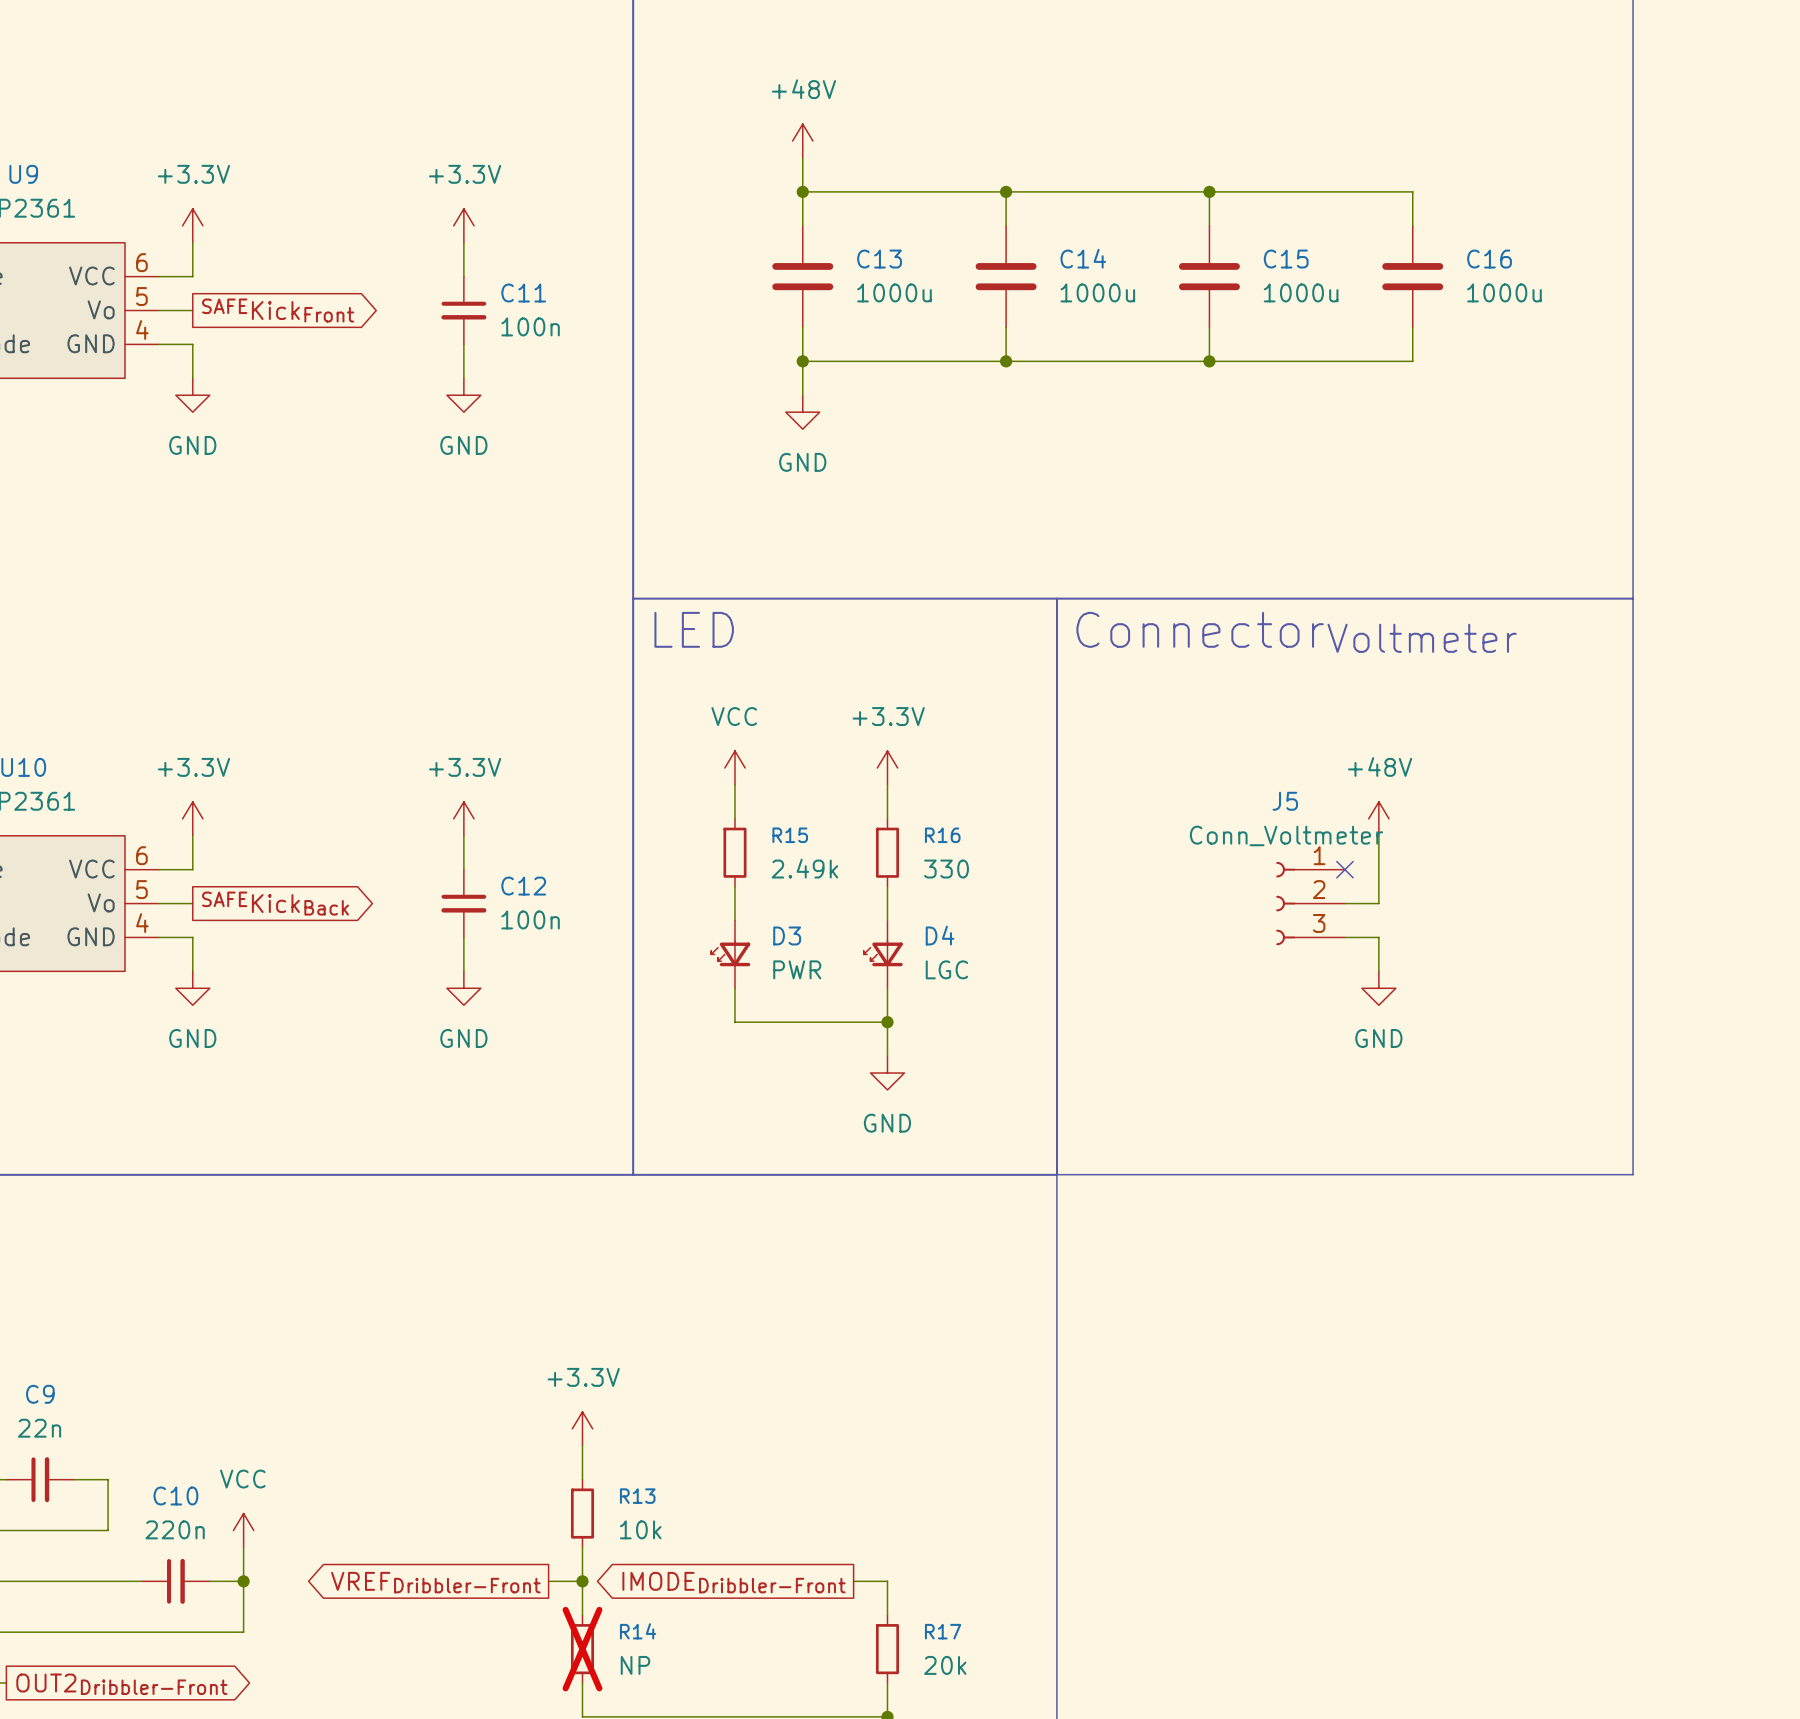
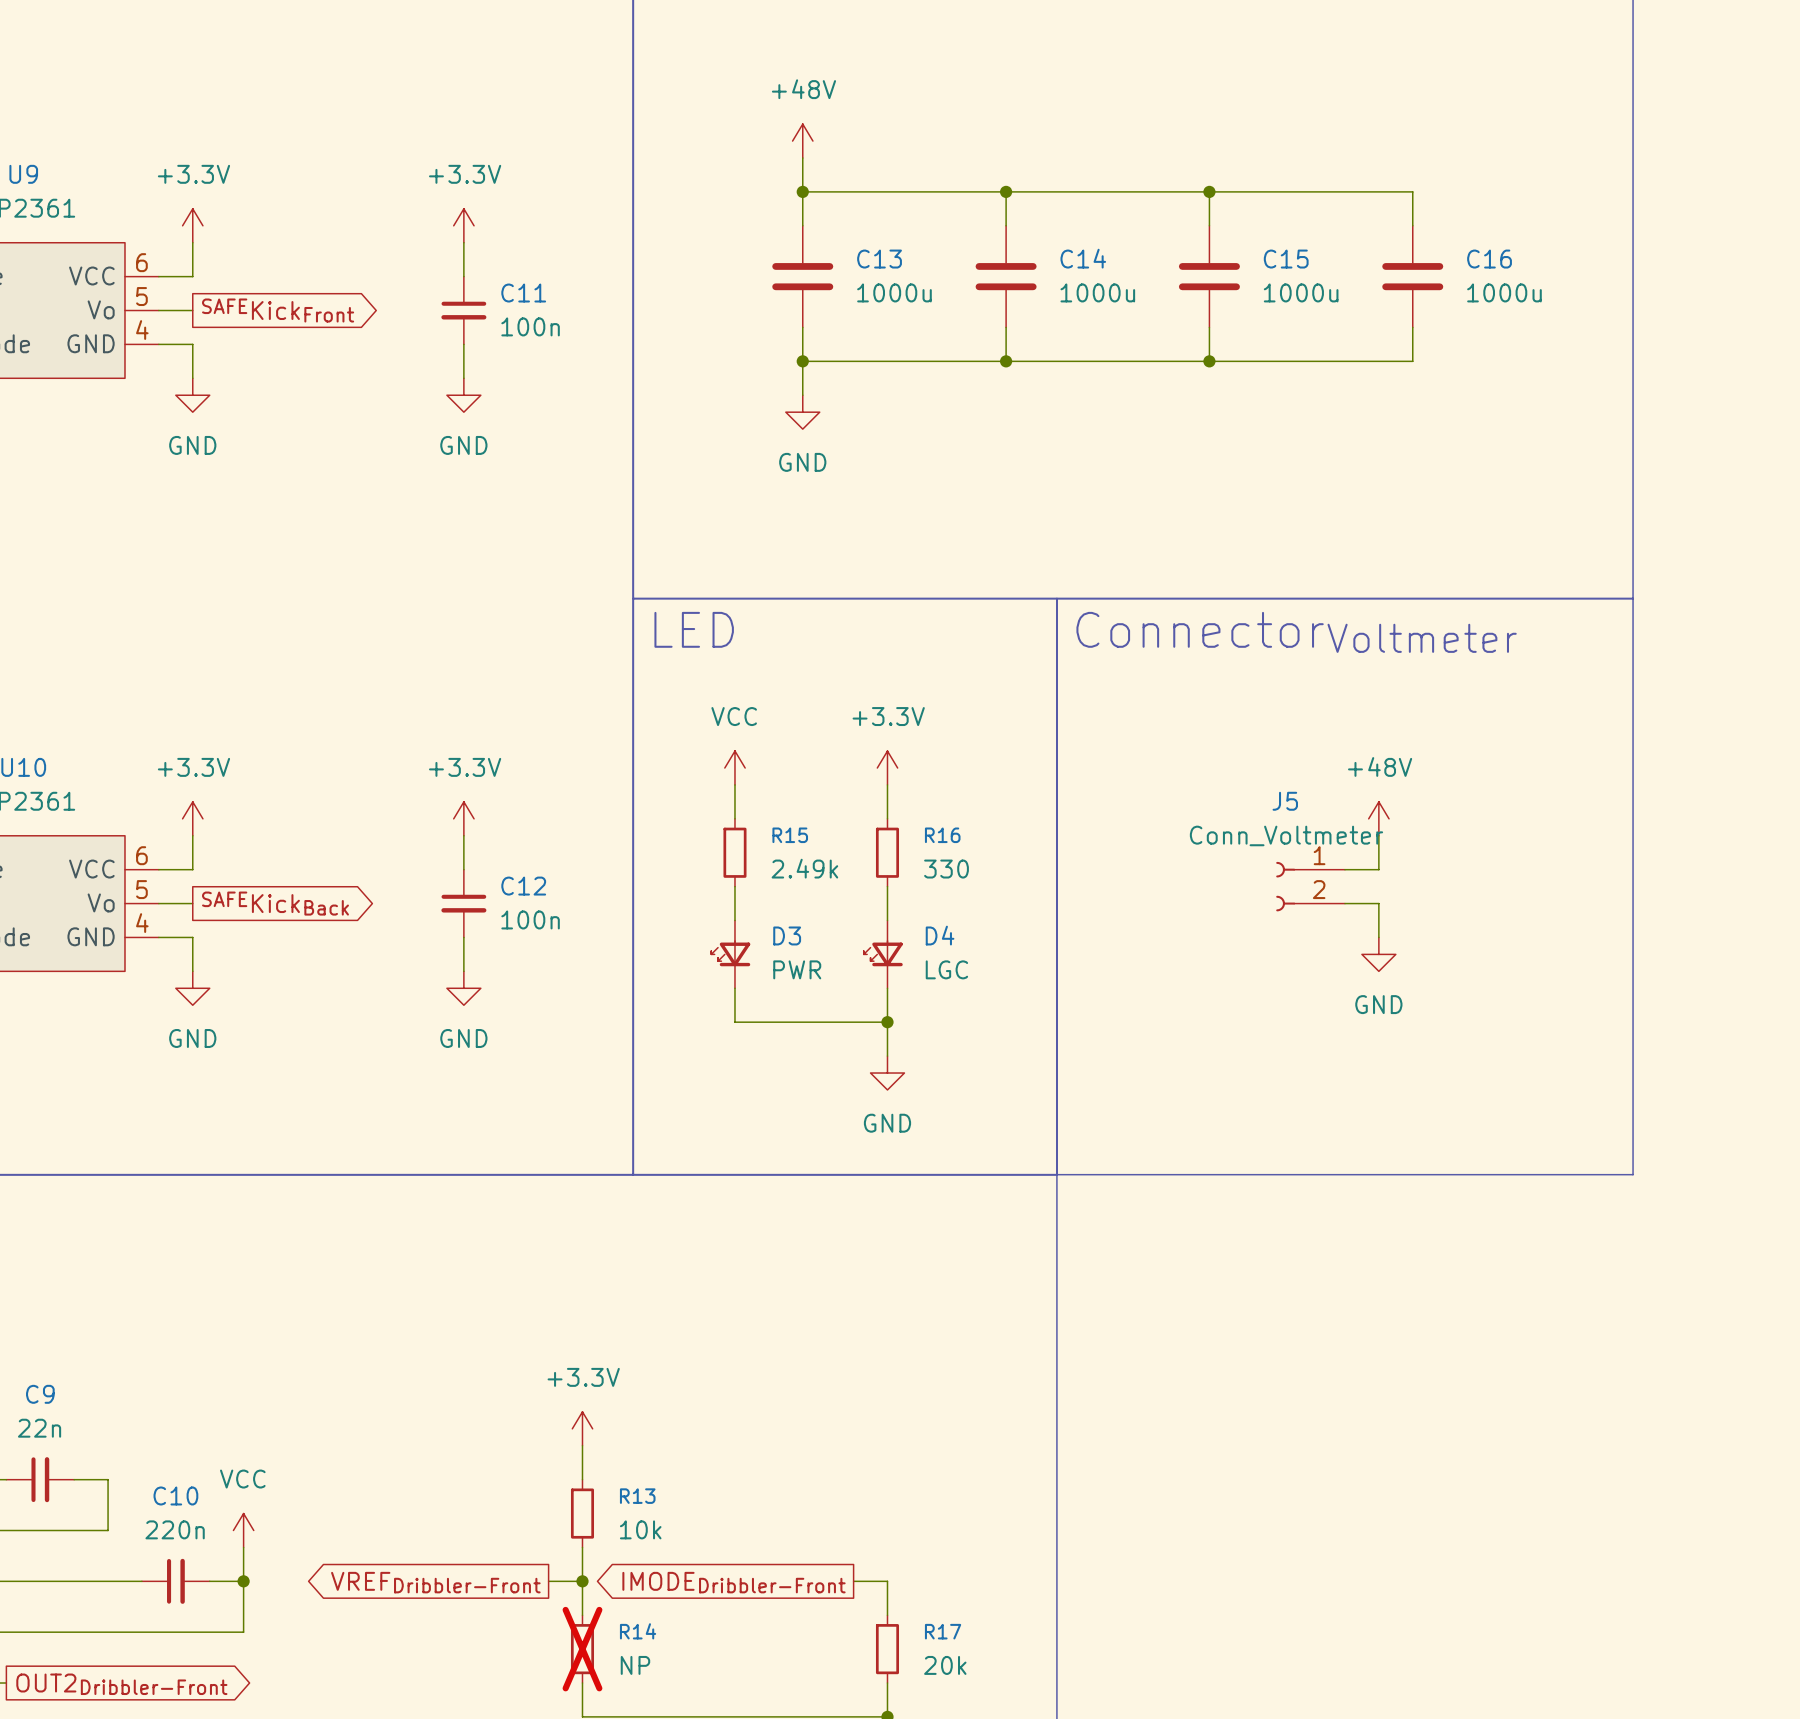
J5 symbol: [1276, 861, 1345, 946] -> [1276, 861, 1345, 912]
no-connect mark: (1344, 869) -> none
wire: (1378, 869) (1378, 903) -> (1378, 869) (1344, 869)
wire: none -> (1378, 903) (1378, 937)
wire: (1344, 937) (1378, 937) (1378, 971) -> none
power symbol position: GND (1378, 988) -> GND (1378, 954)

